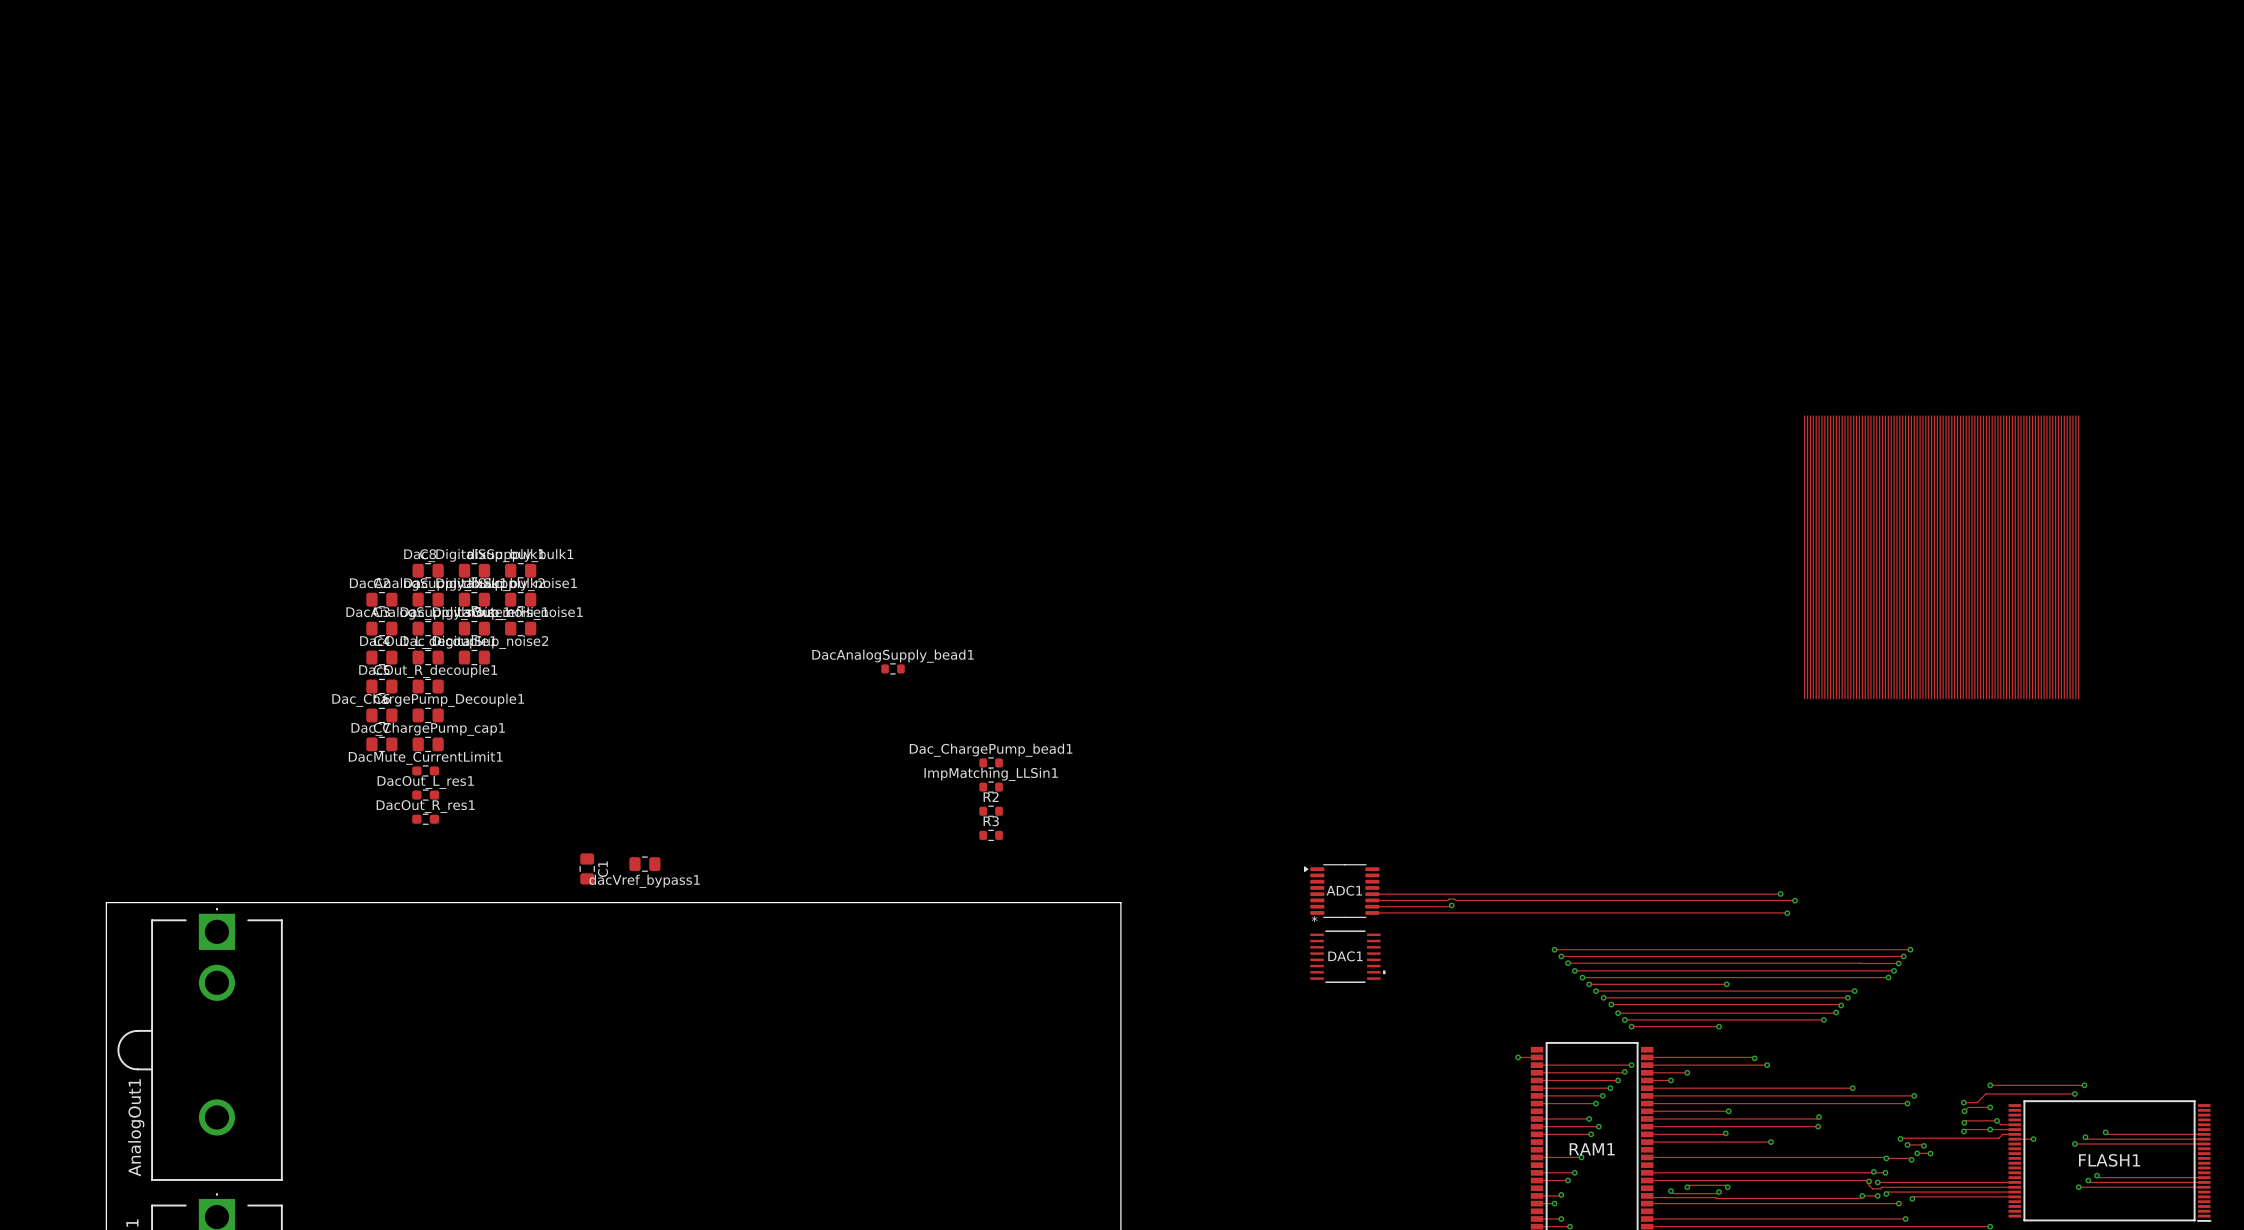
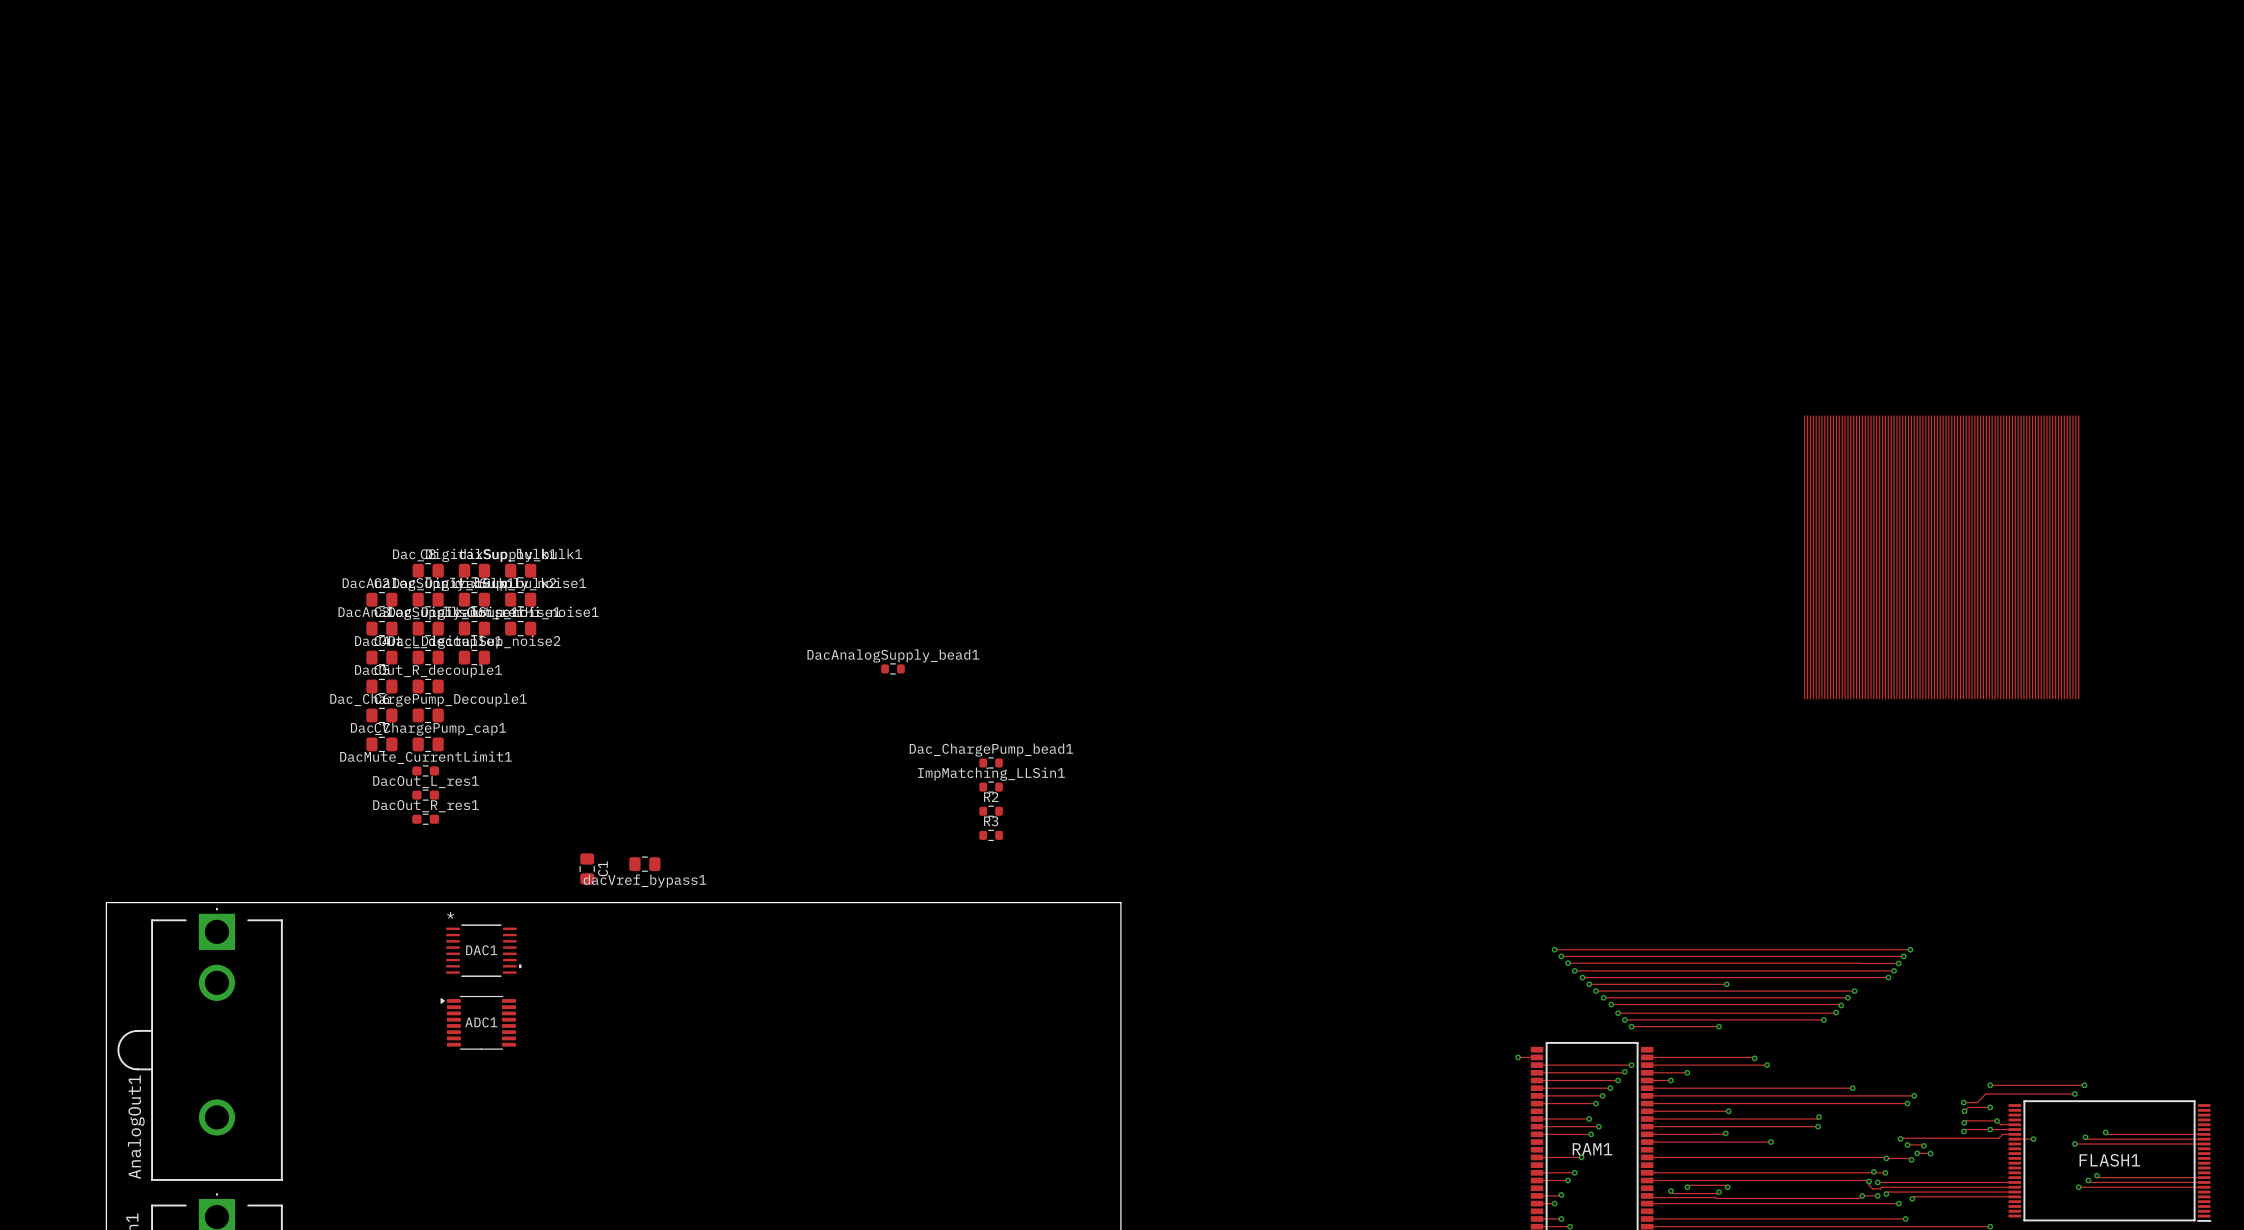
ADC1 position: (1341, 891) -> (478, 1022)
track: (1780, 893) (1372, 894) -> none
via: (1780, 893) -> none
track: (1372, 900) (1795, 900) -> none
via: (1795, 900) -> none
track: (1451, 905) (1365, 906) -> none
via: (1451, 905) -> none
track: (1372, 912) (1787, 913) -> none
via: (1787, 913) -> none
DAC1 position: (1347, 956) -> (483, 950)

